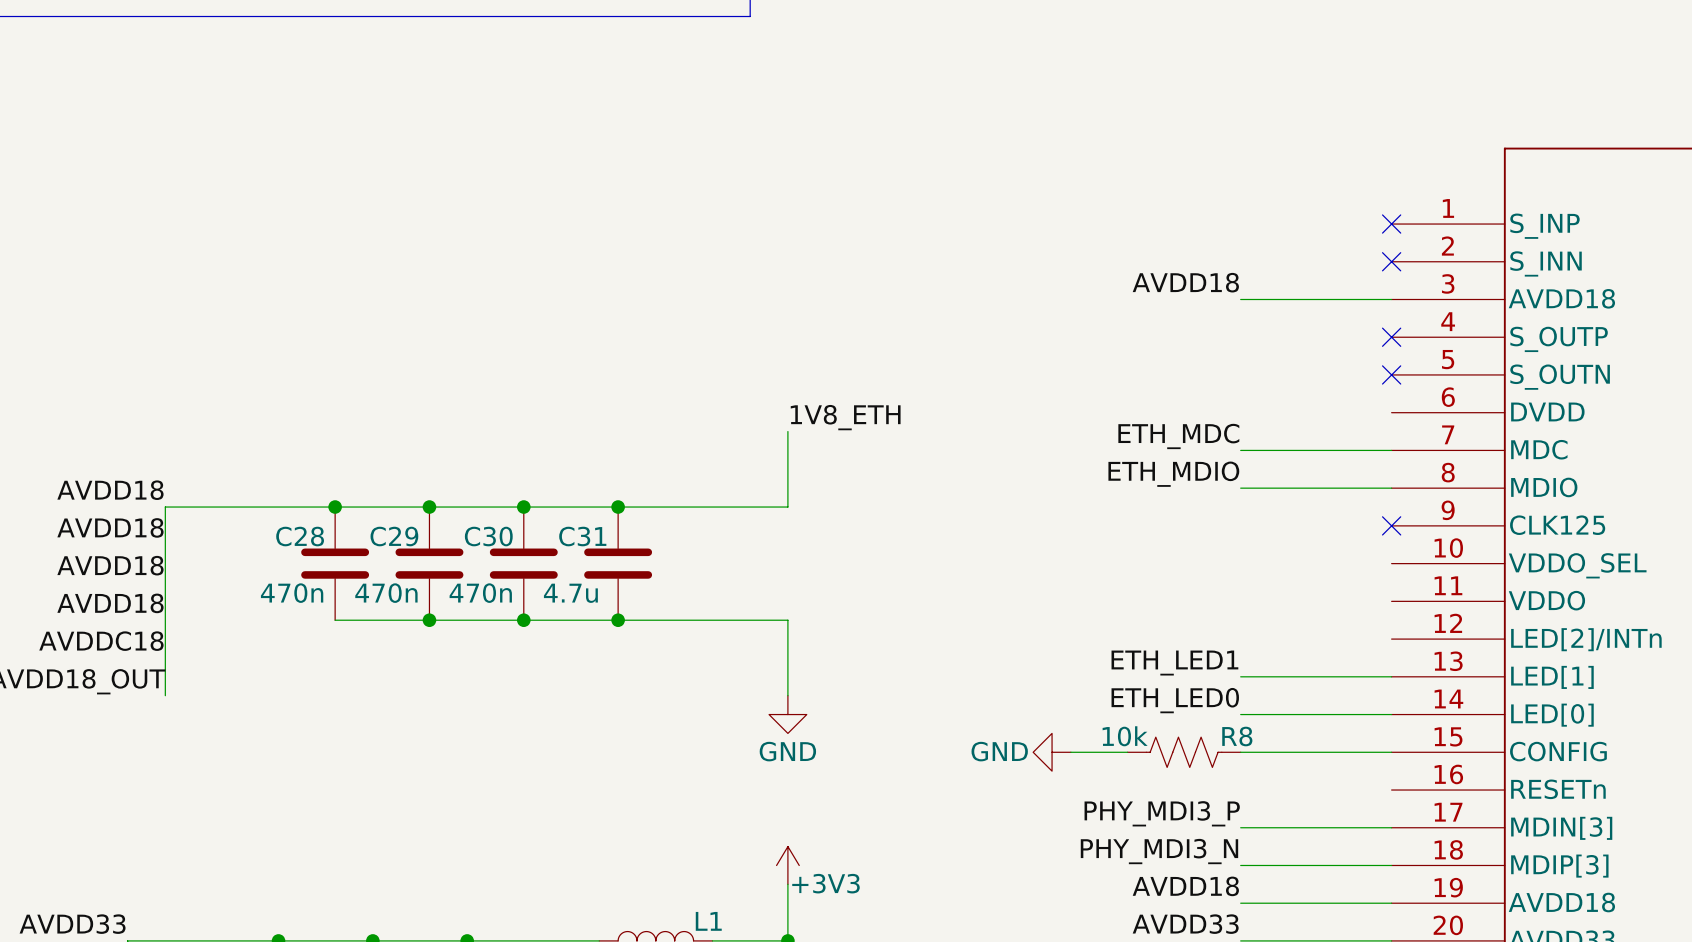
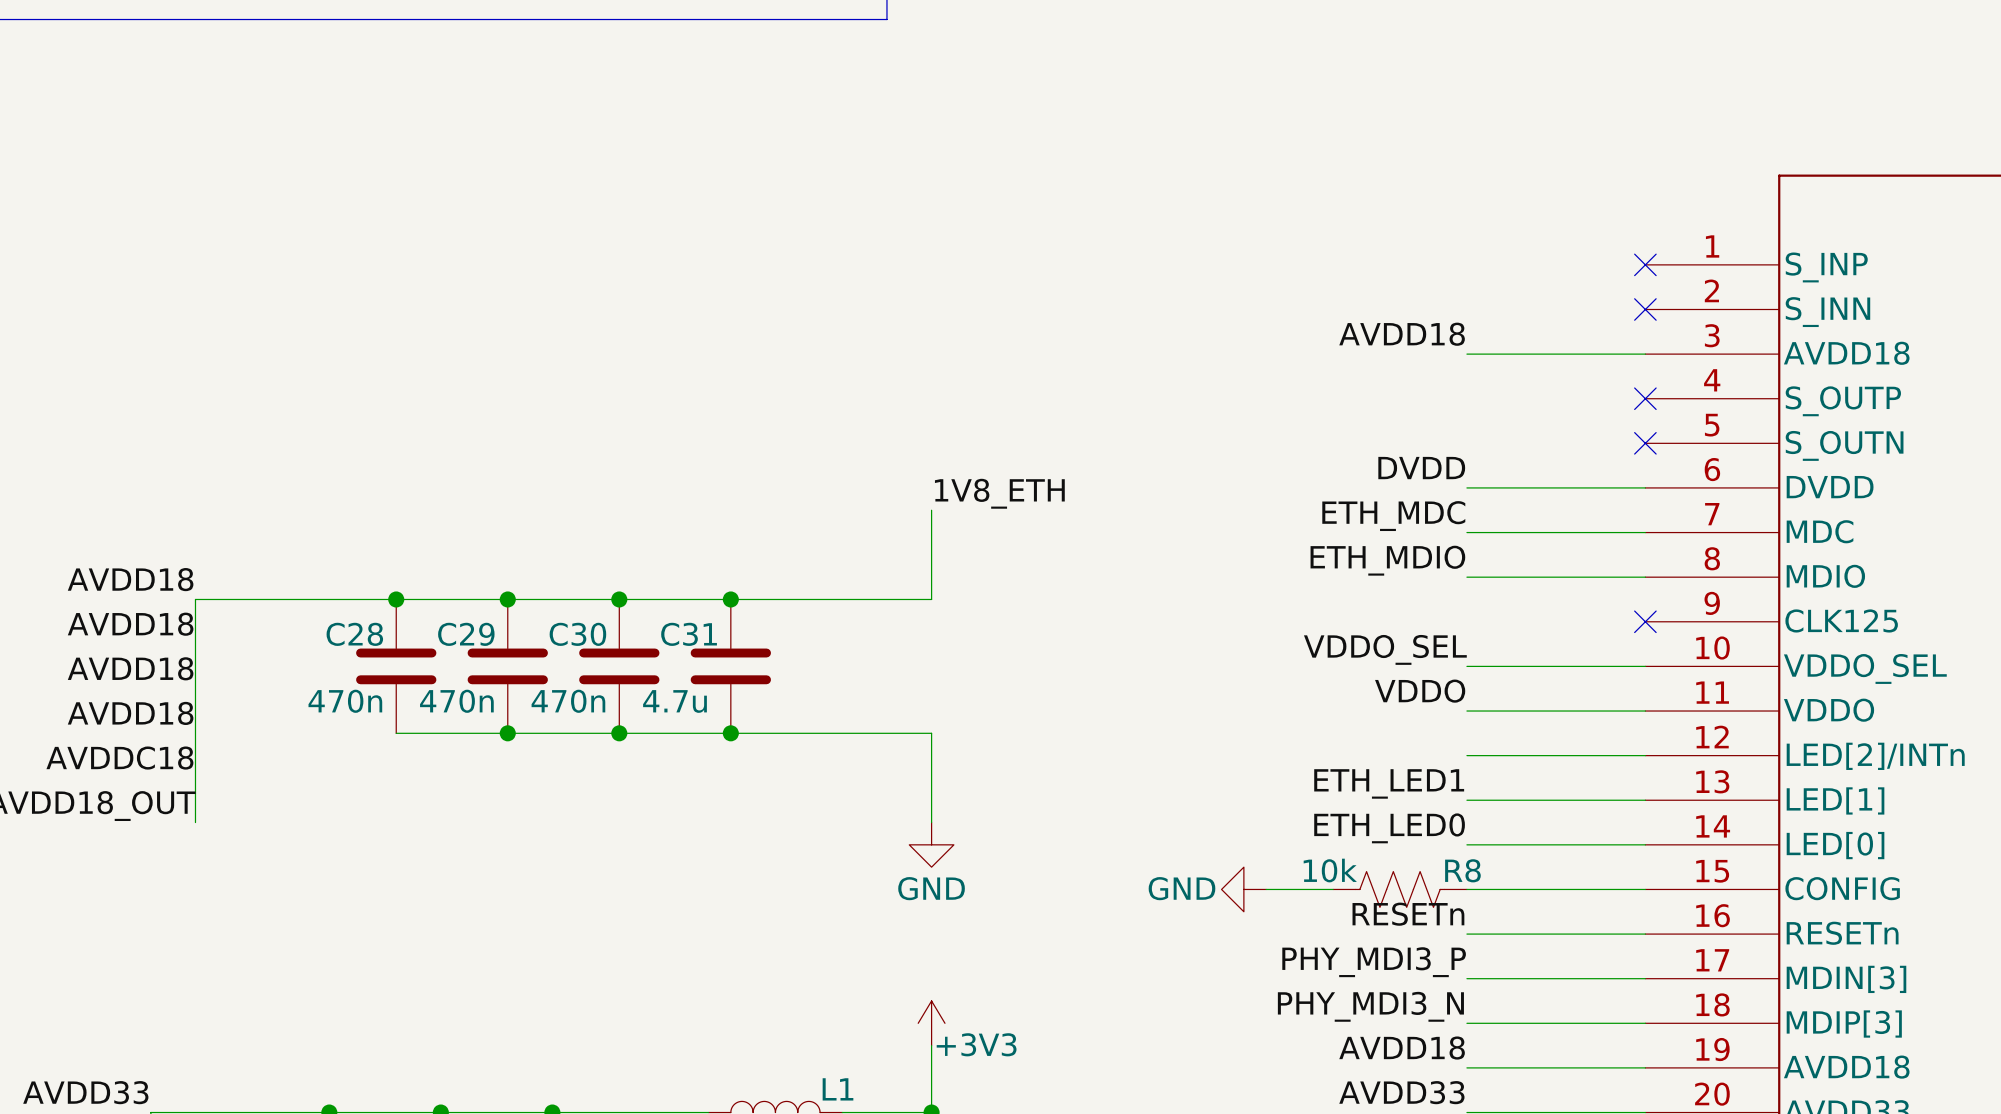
label: none -> DVDD (1421, 468)
wire: none -> (1466, 487) (1645, 487)
label: none -> VDDO_SEL (1385, 649)
wire: none -> (1466, 666) (1645, 666)
label: none -> VDDO (1420, 691)
wire: none -> (1466, 711) (1645, 711)
wire: none -> (1466, 755) (1645, 755)
label: none -> RESETn (1408, 914)
wire: none -> (1466, 934) (1645, 934)

